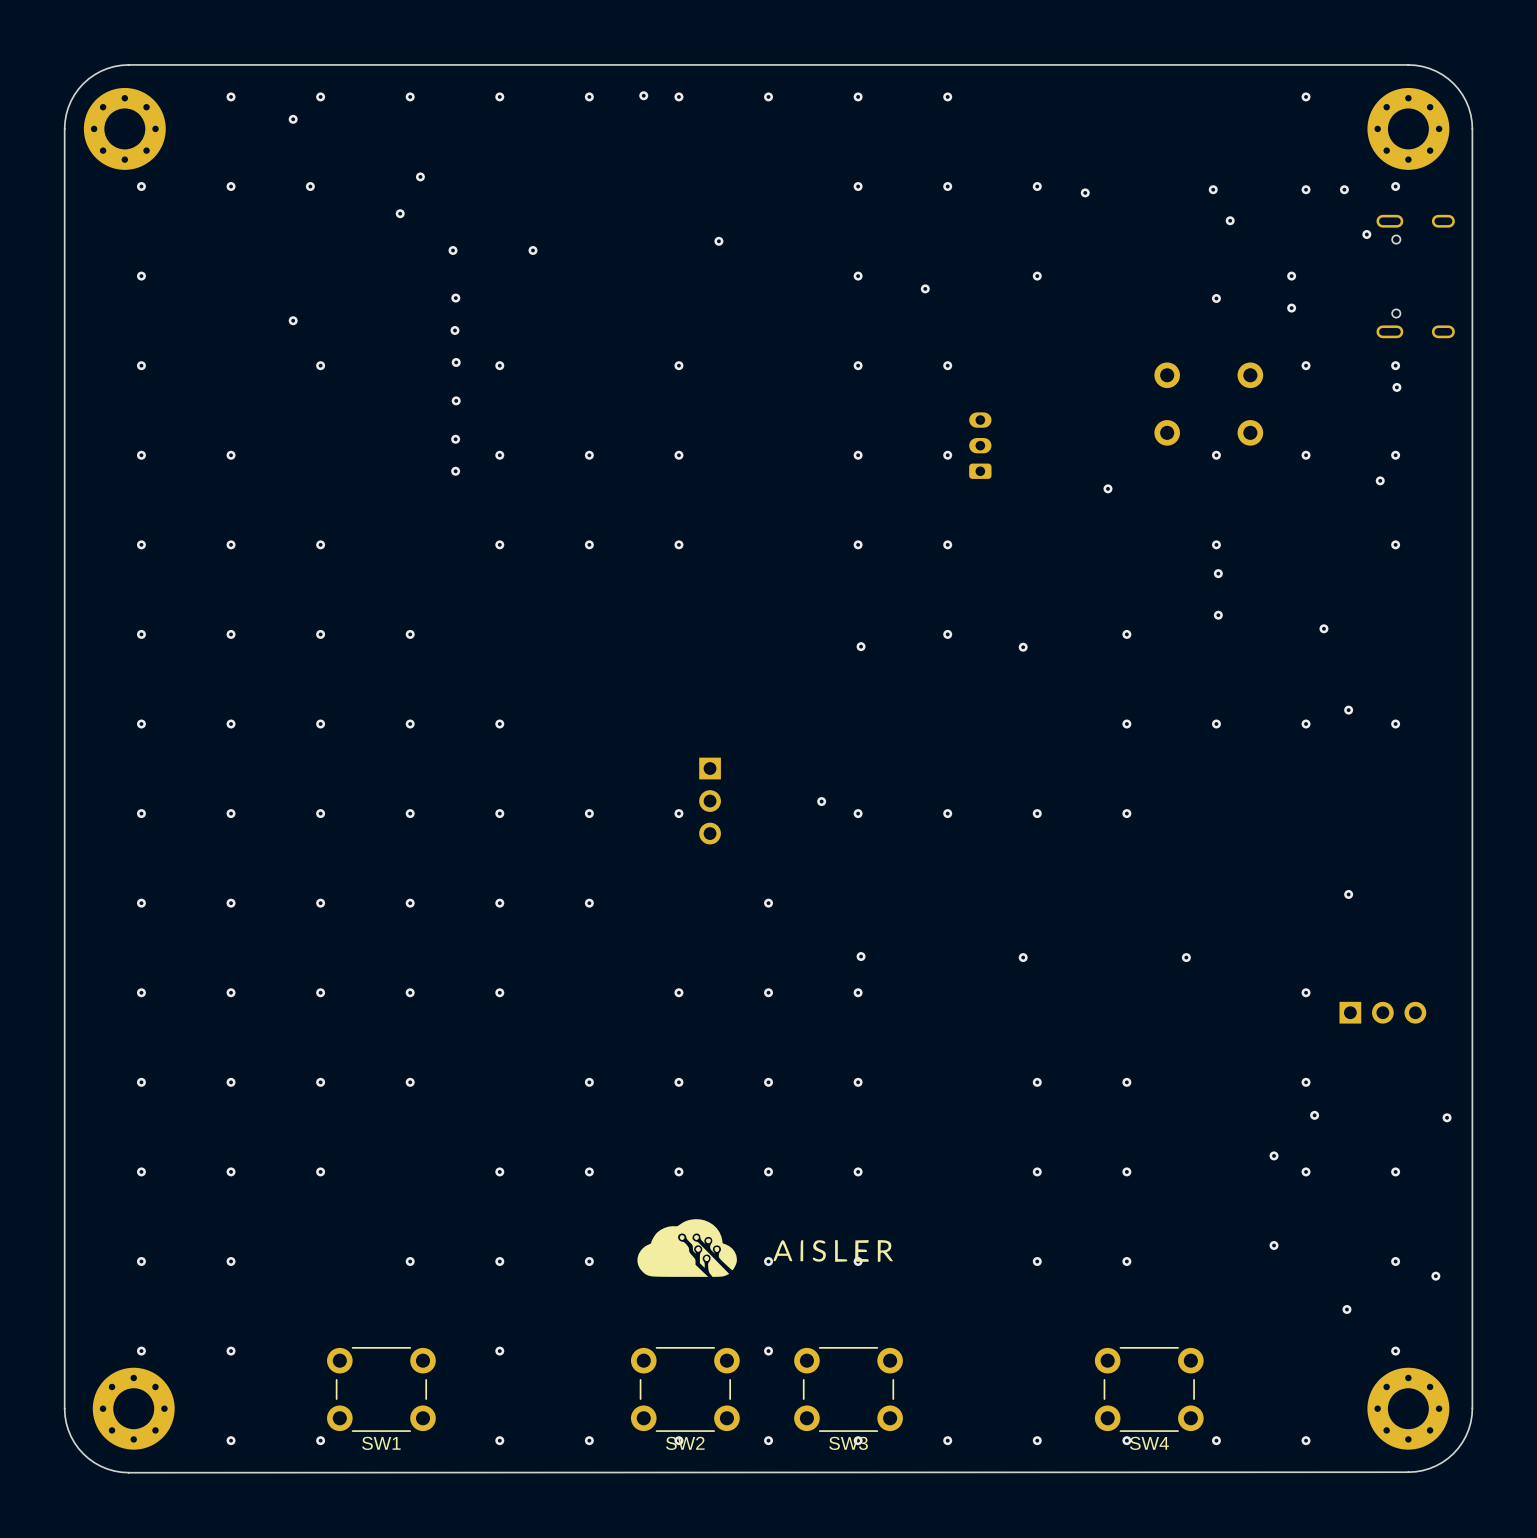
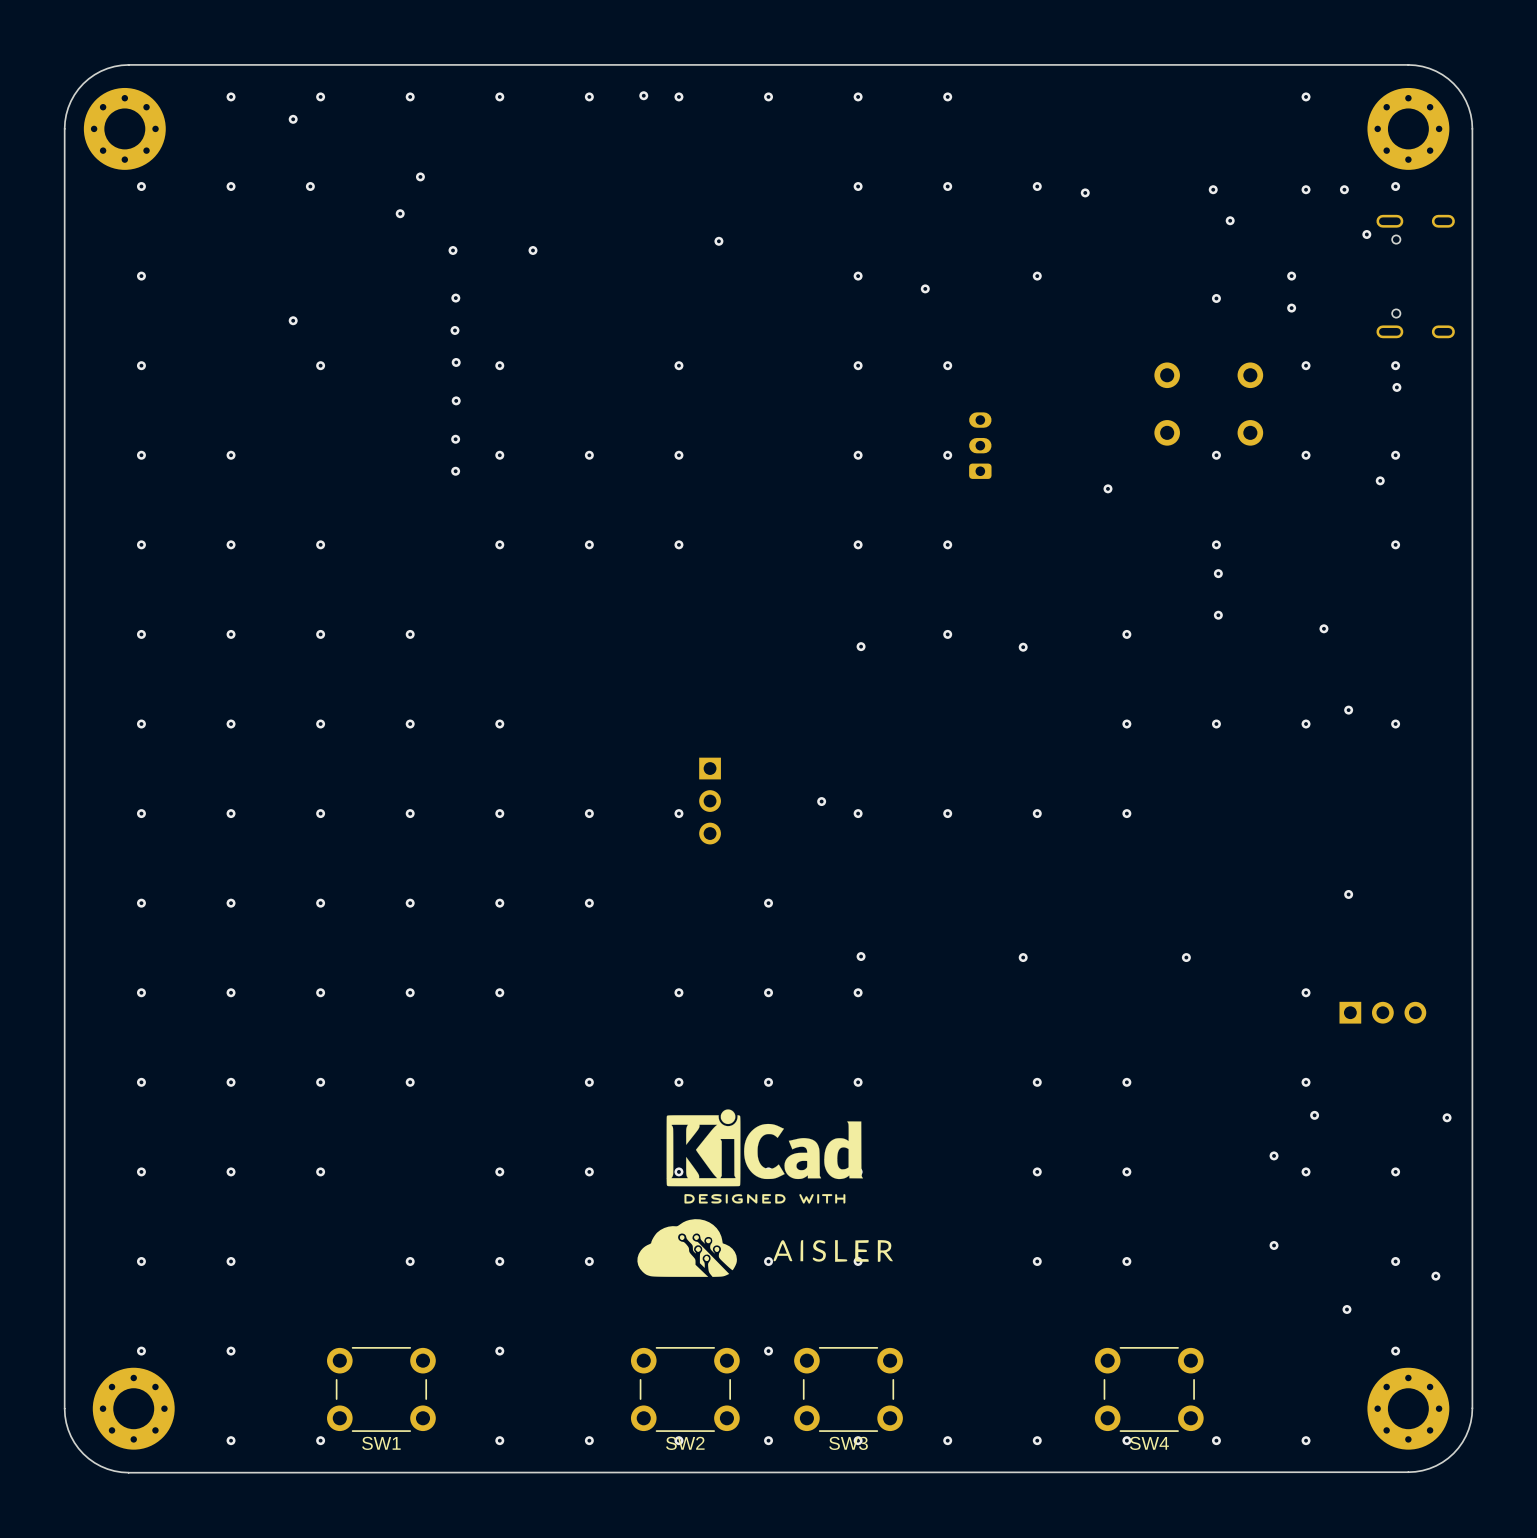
drawing: none -> [666, 1109, 863, 1204]

